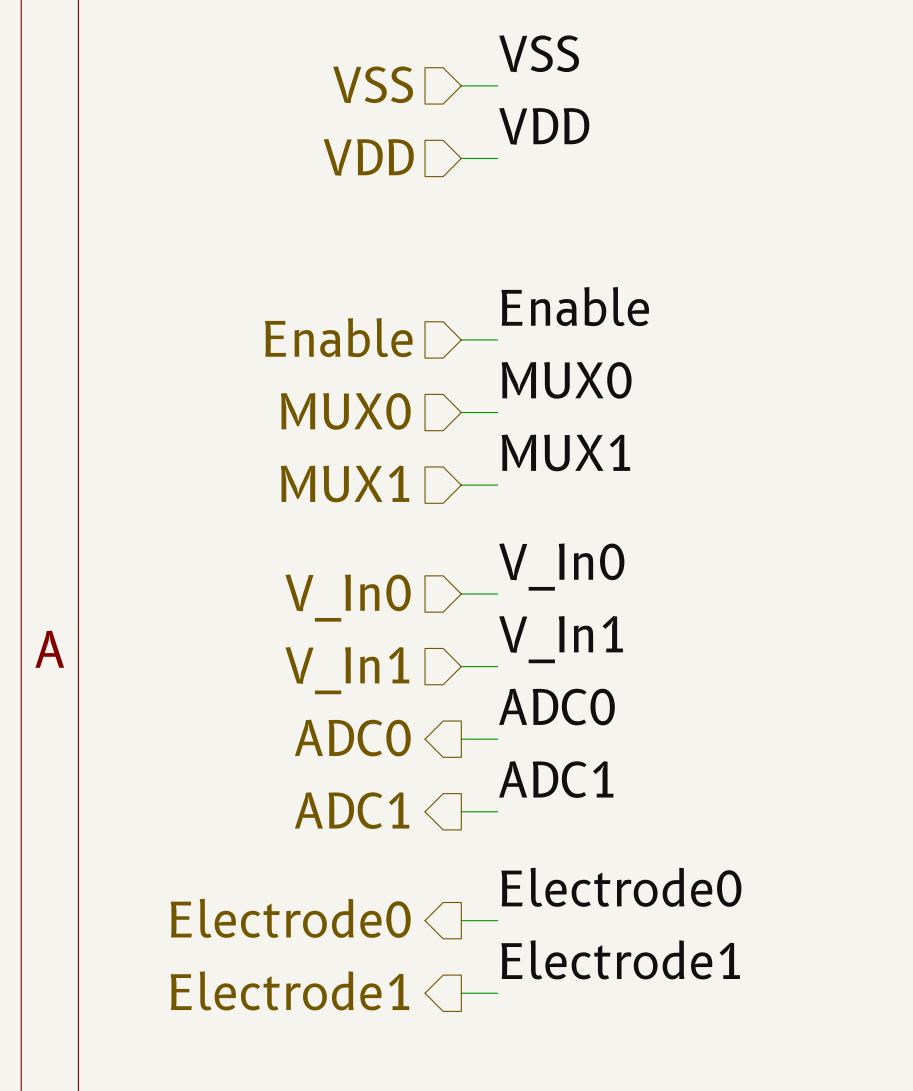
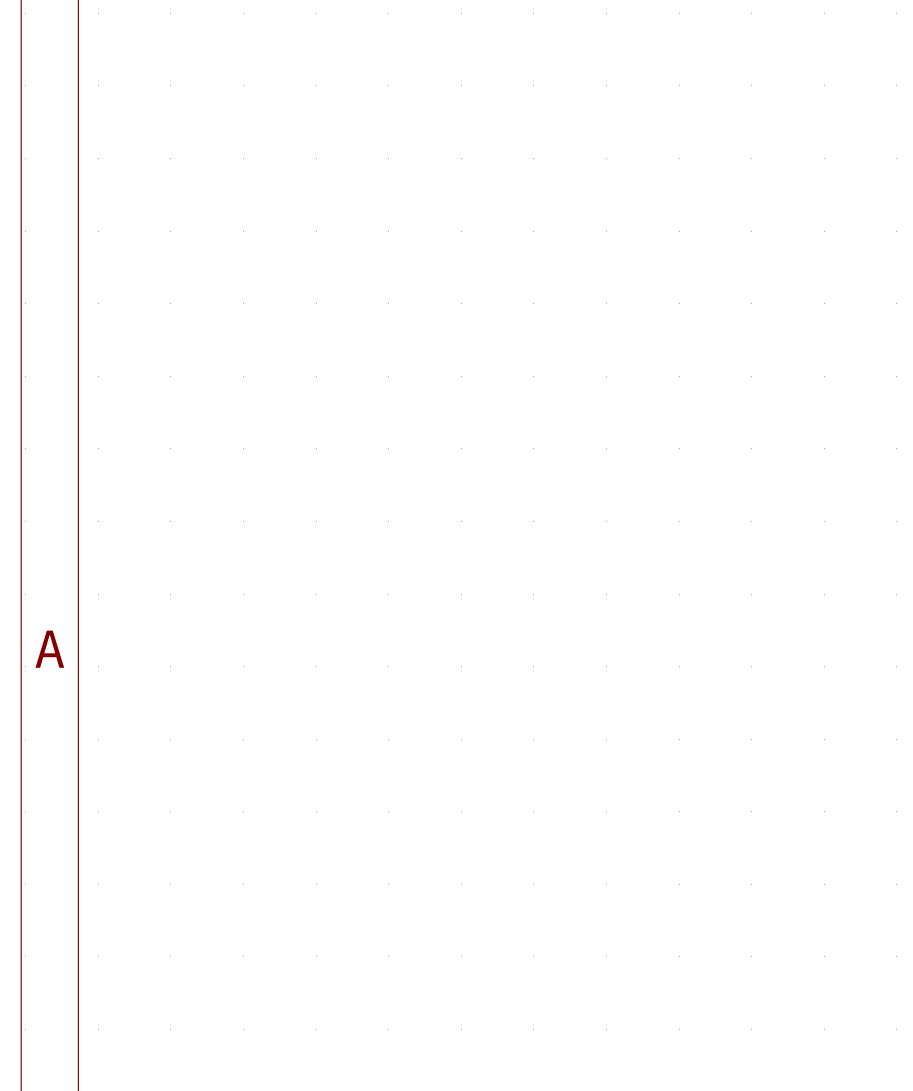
label: VSS (539, 53) -> none
hierarchical label: VSS (373, 84) -> none
wire: (461, 85) (497, 85) -> none
label: VDD (544, 126) -> none
hierarchical label: VDD (368, 157) -> none
wire: (461, 158) (497, 158) -> none
label: Enable (575, 306) -> none
hierarchical label: Enable (338, 337) -> none
wire: (461, 339) (497, 339) -> none
label: MUX0 (566, 380) -> none
hierarchical label: MUX0 (345, 411) -> none
wire: (461, 412) (497, 412) -> none
label: MUX1 (565, 452) -> none
hierarchical label: MUX1 (345, 483) -> none
wire: (461, 485) (497, 485) -> none
label: V_In0 (561, 567) -> none
wire: (461, 594) (497, 594) -> none
hierarchical label: V_In0 (348, 598) -> none
label: V_In1 (561, 639) -> none
wire: (461, 666) (497, 666) -> none
hierarchical label: V_In1 (347, 670) -> none
label: ADC0 (556, 707) -> none
hierarchical label: ADC0 (352, 738) -> none
wire: (461, 739) (497, 739) -> none
label: ADC1 (556, 779) -> none
hierarchical label: ADC1 (352, 810) -> none
wire: (461, 811) (497, 811) -> none
label: Electrode0 (621, 887) -> none
hierarchical label: Electrode0 (290, 918) -> none
wire: (461, 920) (497, 920) -> none
label: Electrode1 (620, 959) -> none
hierarchical label: Electrode1 (289, 990) -> none
wire: (461, 993) (497, 993) -> none

